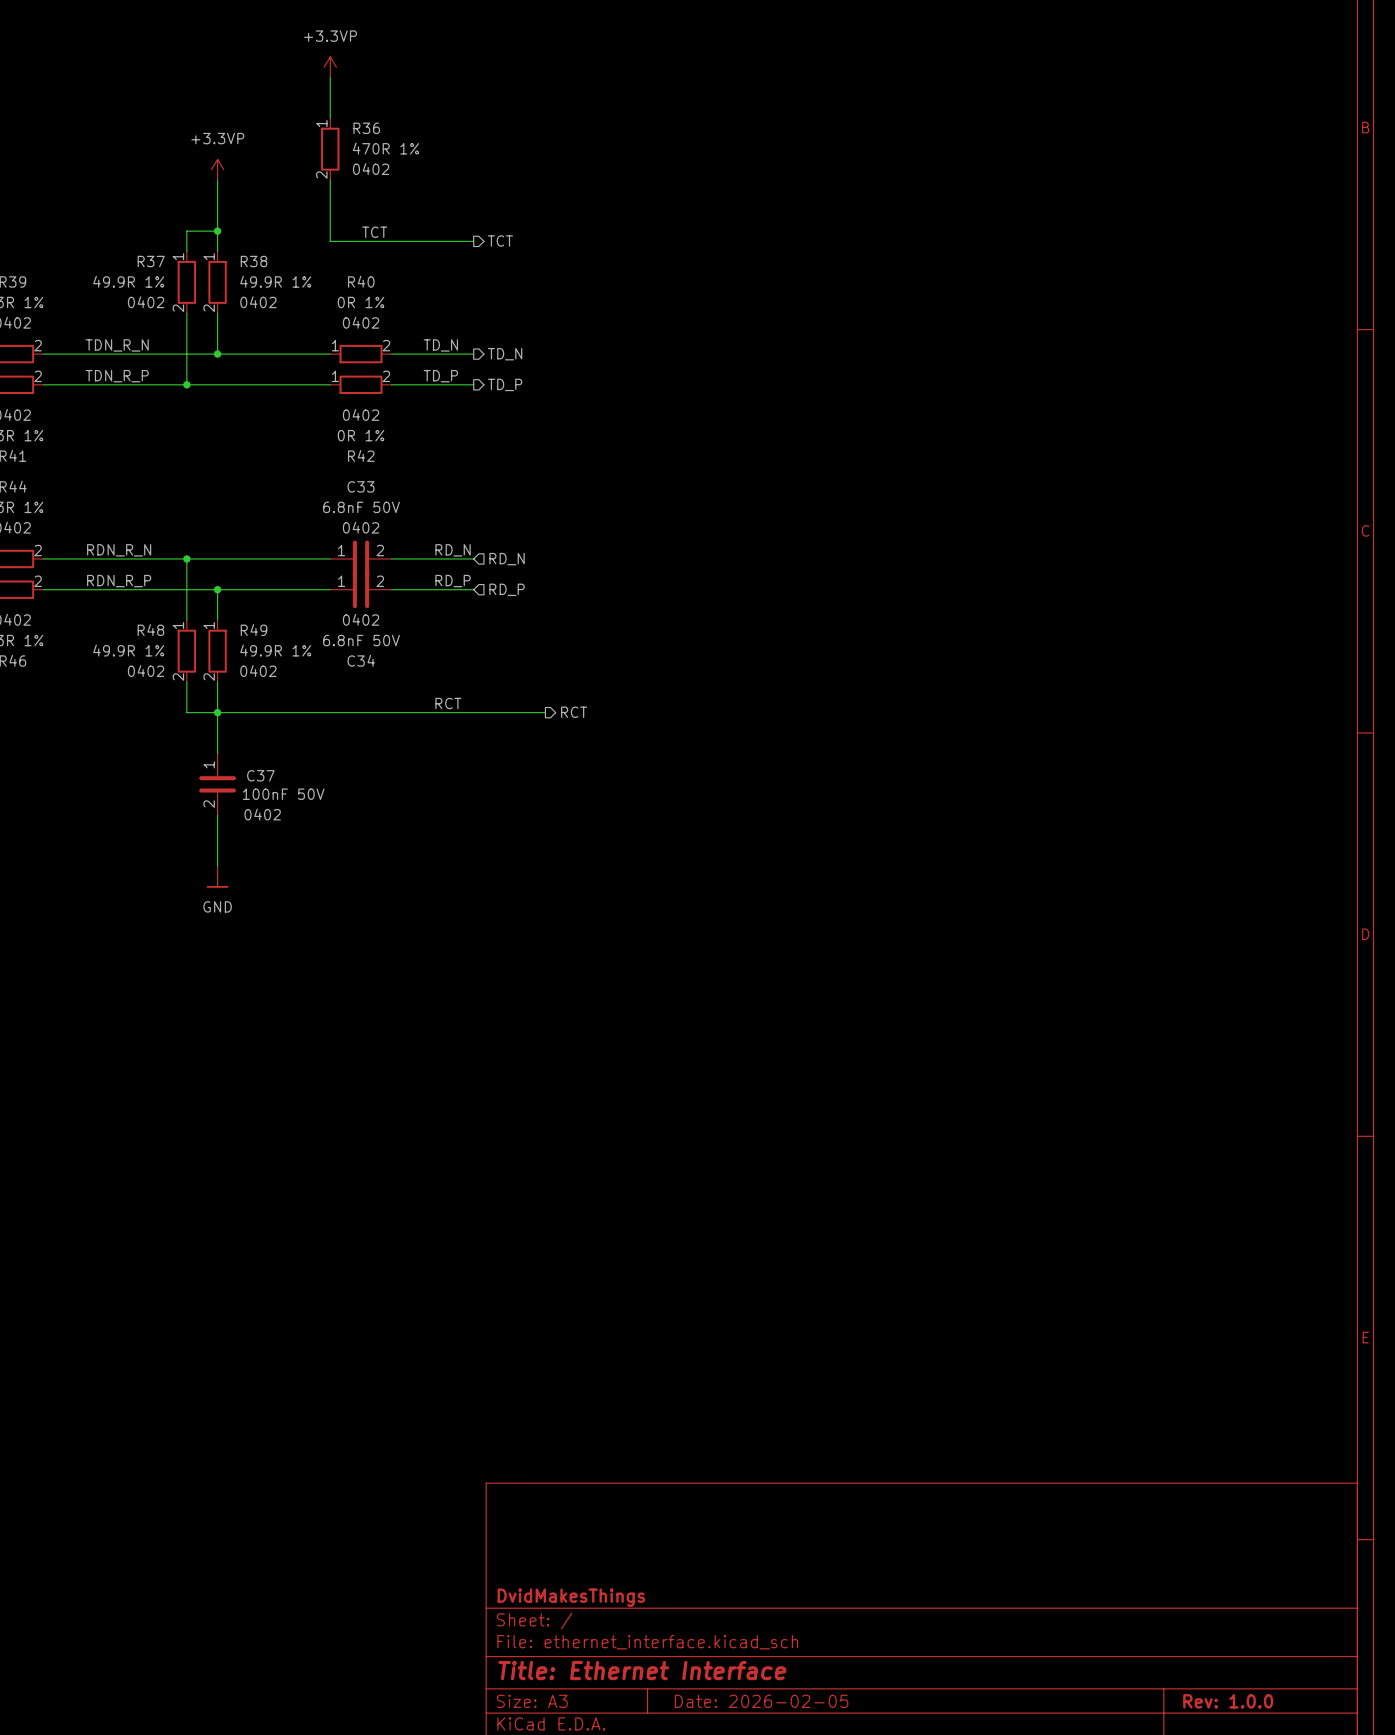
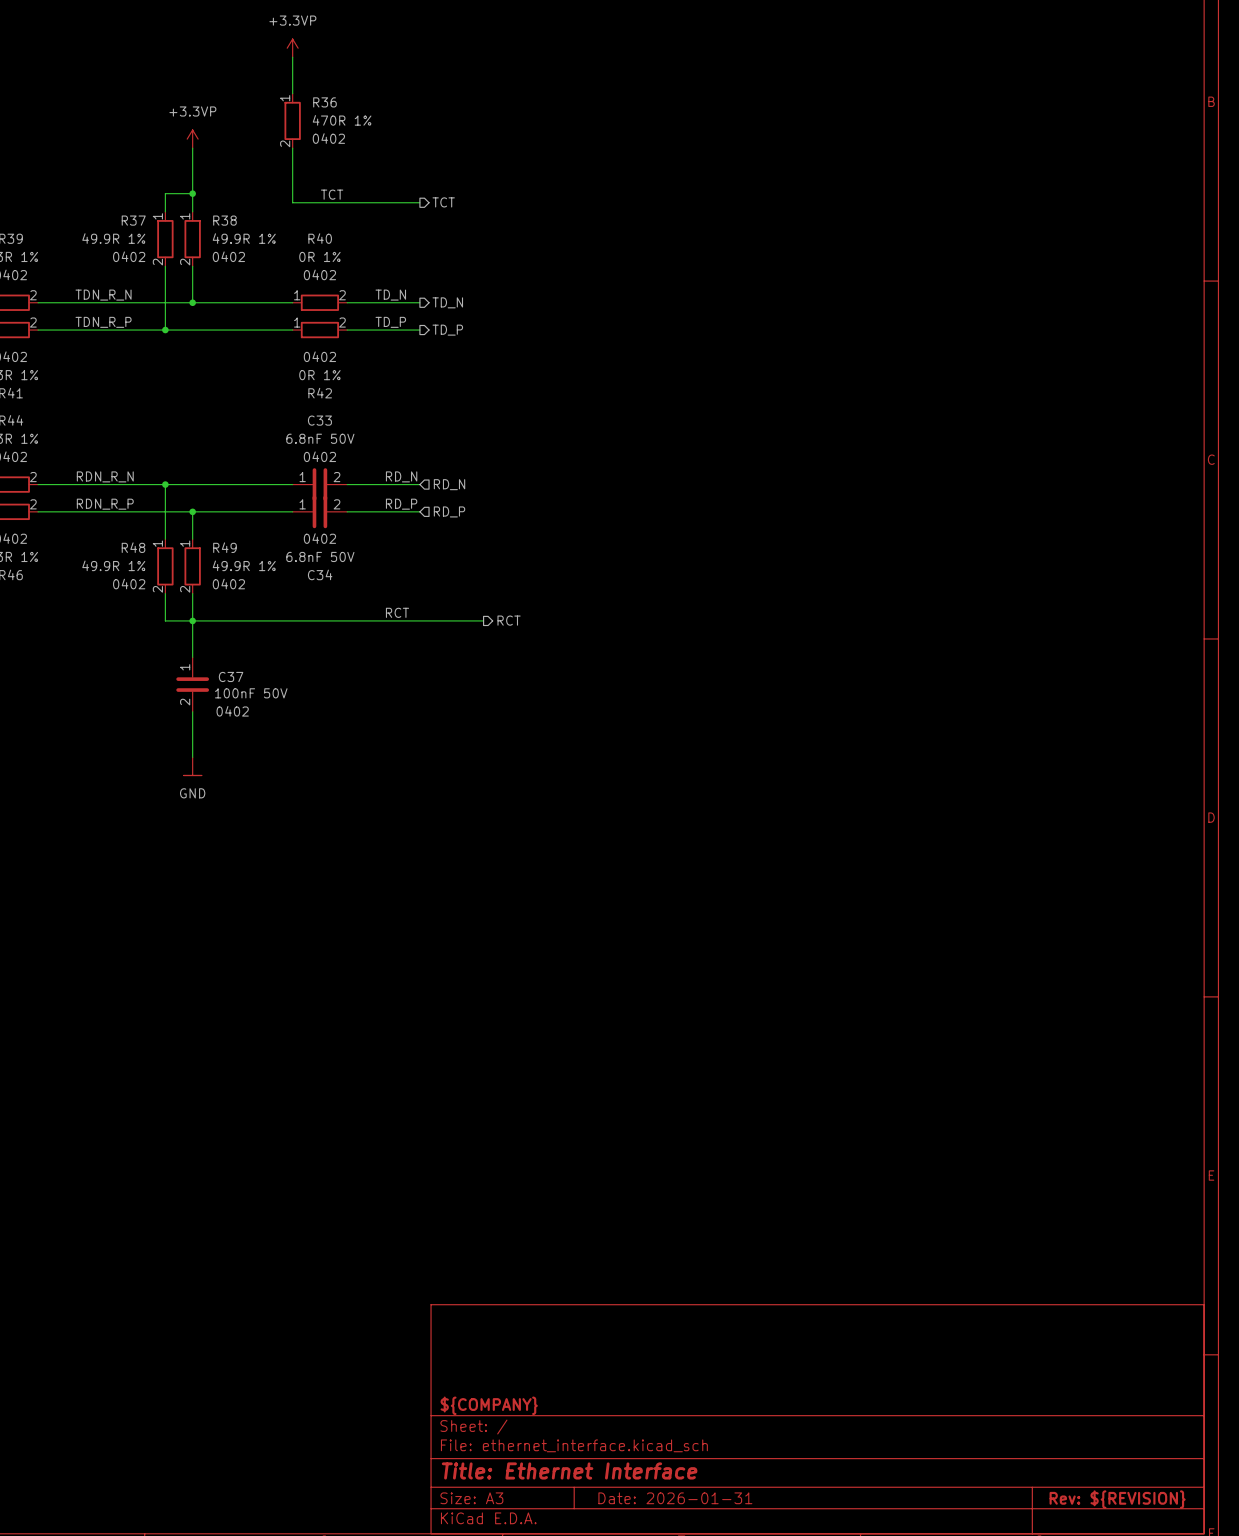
title block: DvidMakesThings (571, 1597) -> ${COMPANY} (489, 1405)
title block: Date: 2026-02-05 (761, 1701) -> Date: 2026-01-31 (675, 1498)
title block: Rev: 1.0.0 (1228, 1701) -> Rev: ${REVISION} (1117, 1499)

